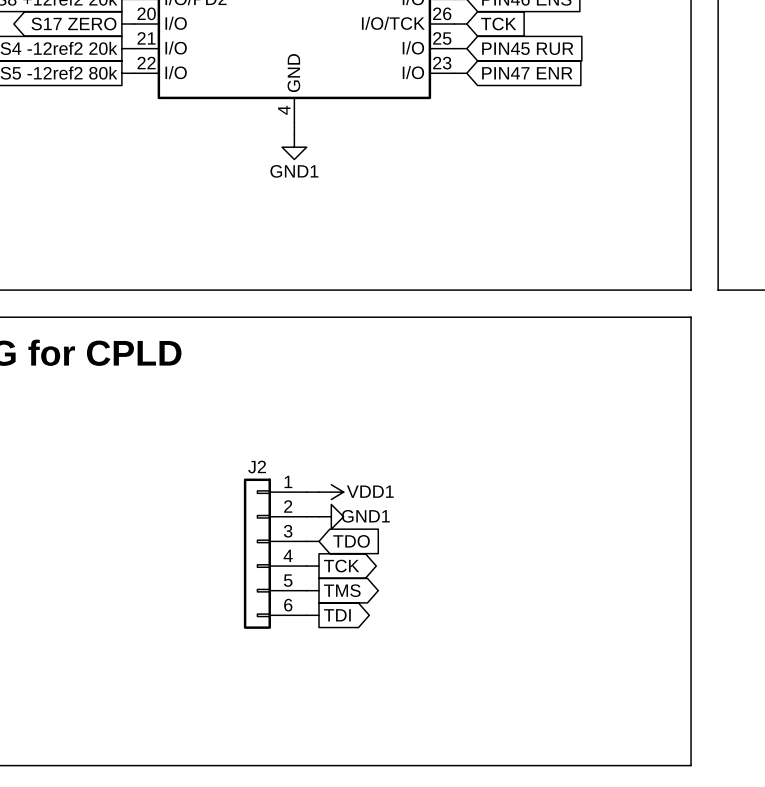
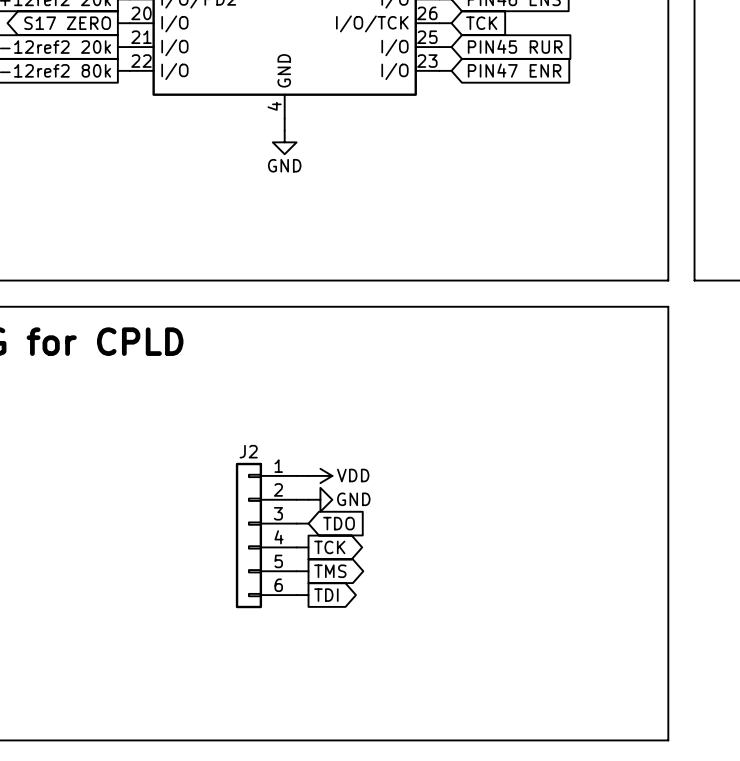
power symbol: GND1 (294, 147) -> GND (284, 142)
power symbol: VDD1 (331, 492) -> VDD (320, 475)
power symbol: GND1 (331, 516) -> GND (320, 499)

